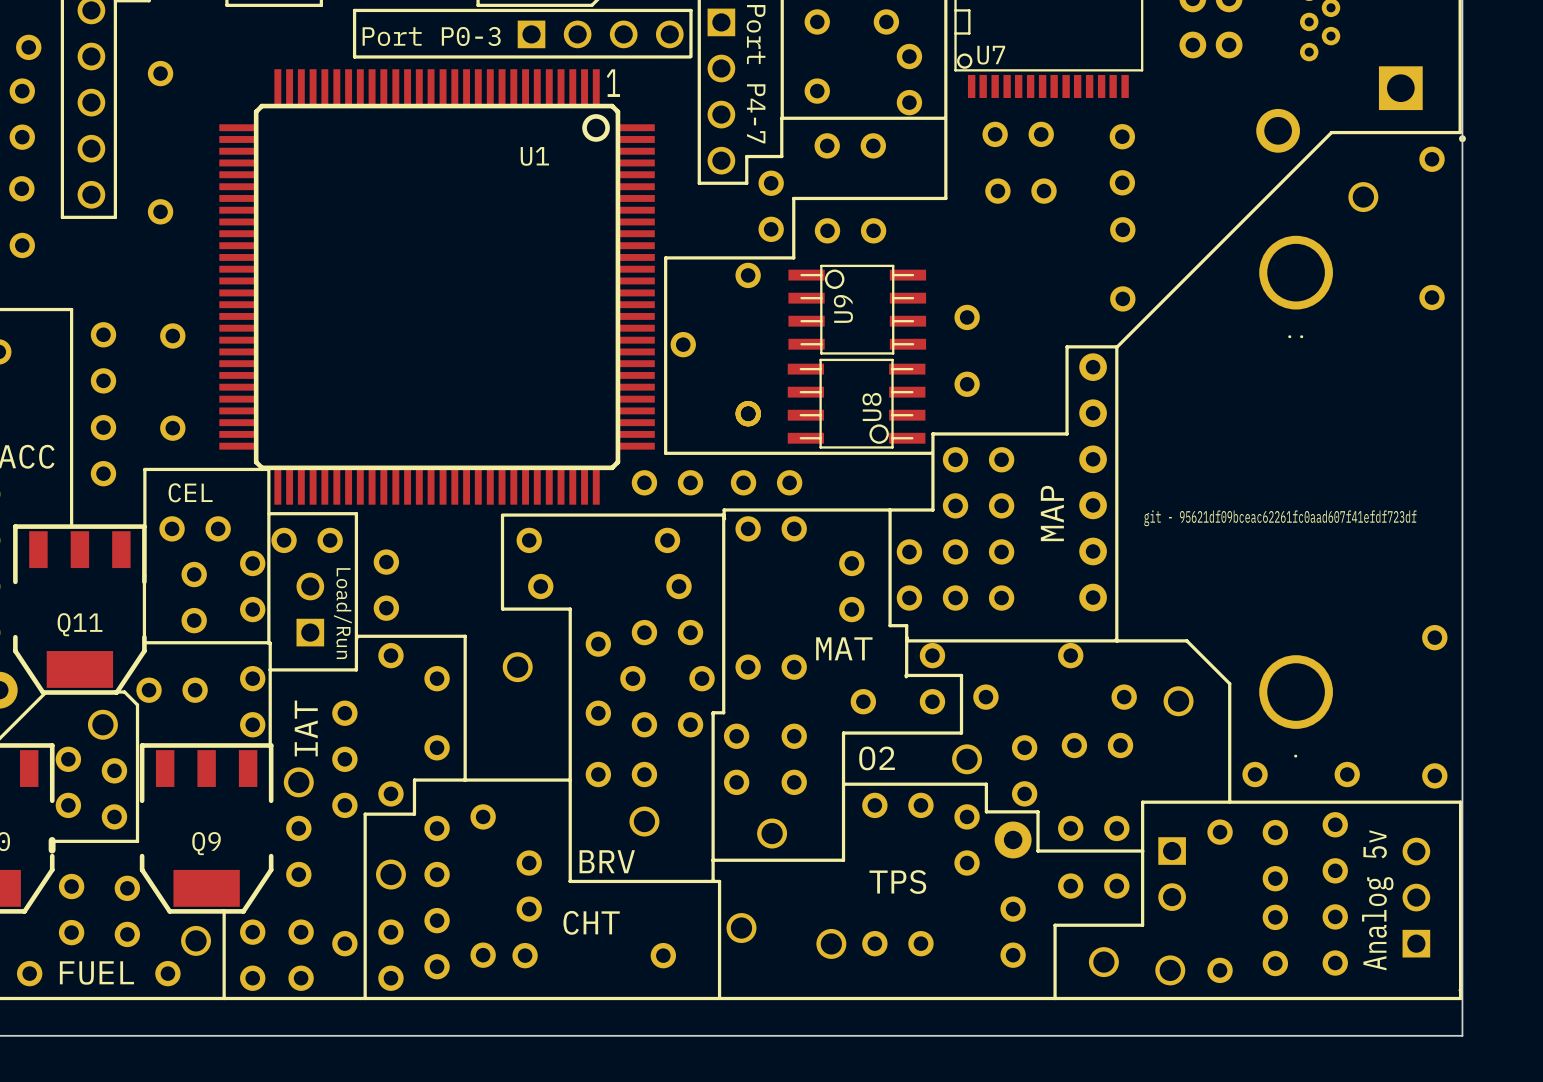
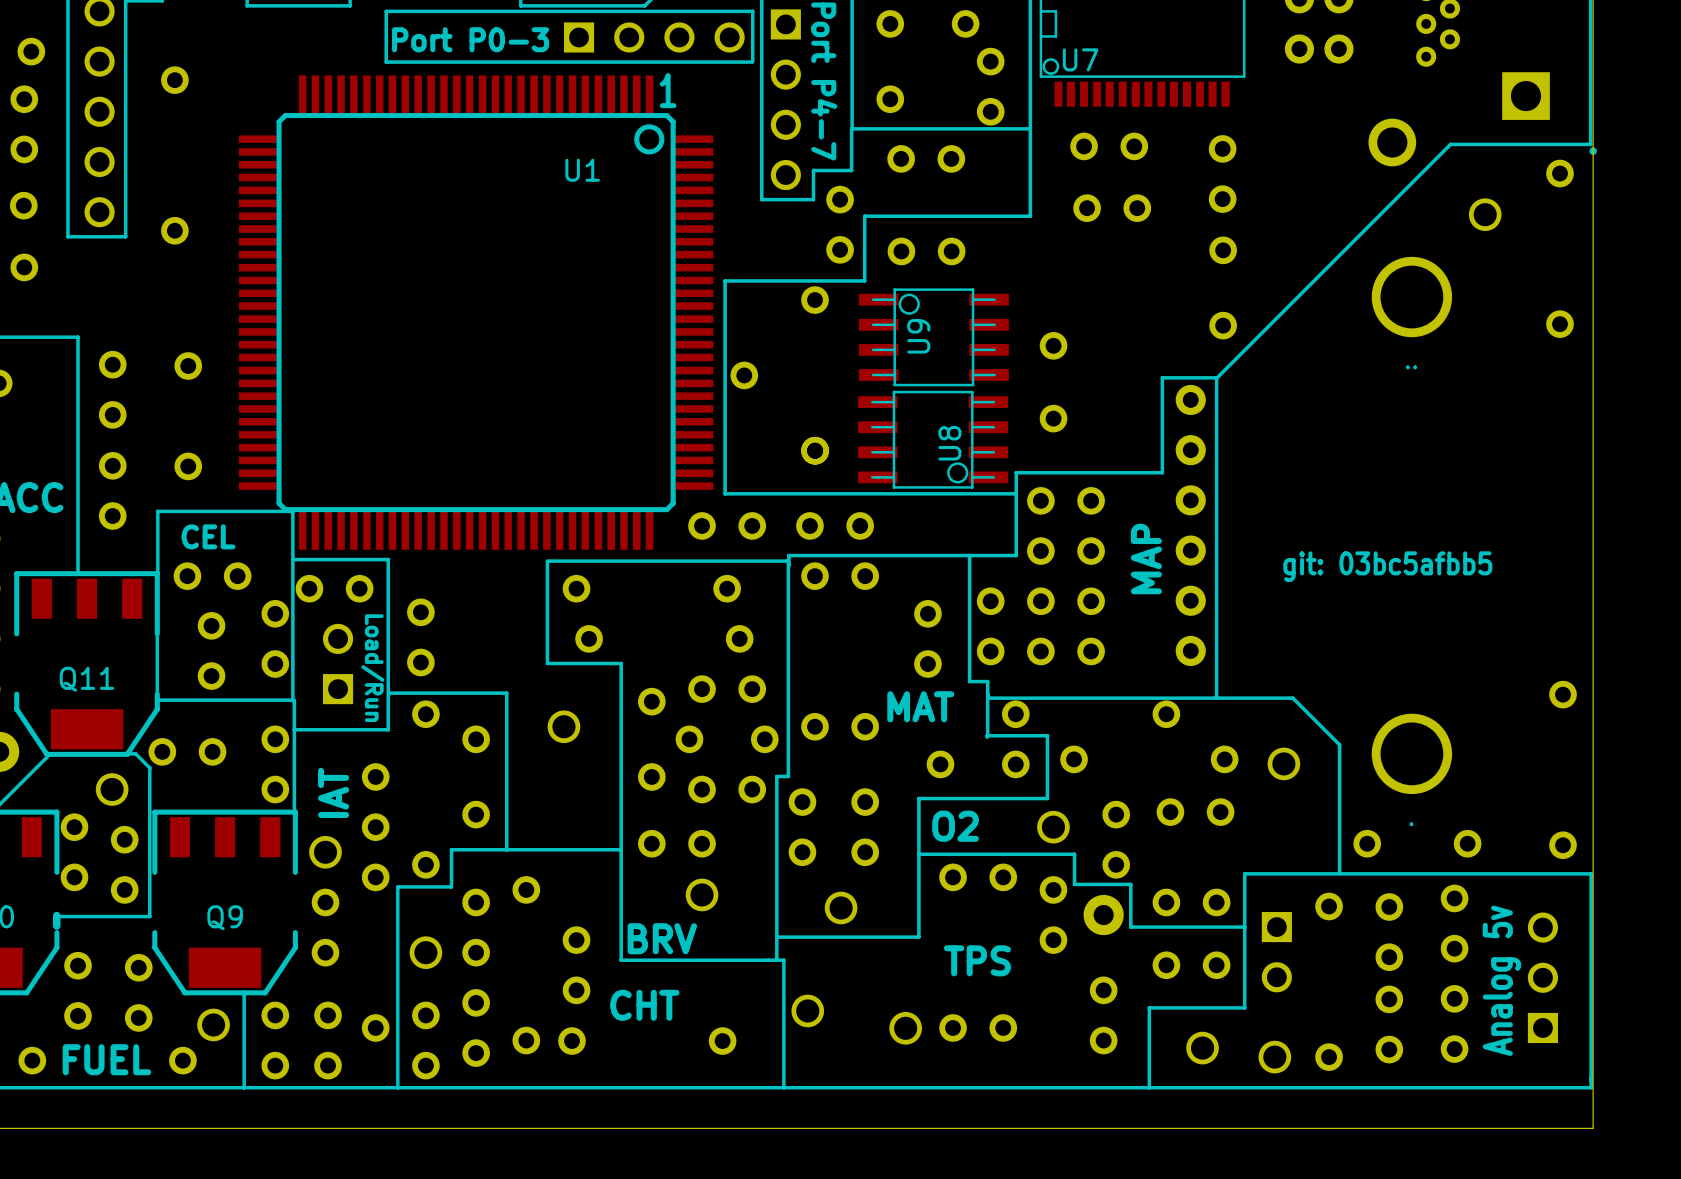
text: git - 95621df09bceac62261fc0aad607f41efdf723df (1280, 518) -> git: 03bc5afbb5 (1387, 566)

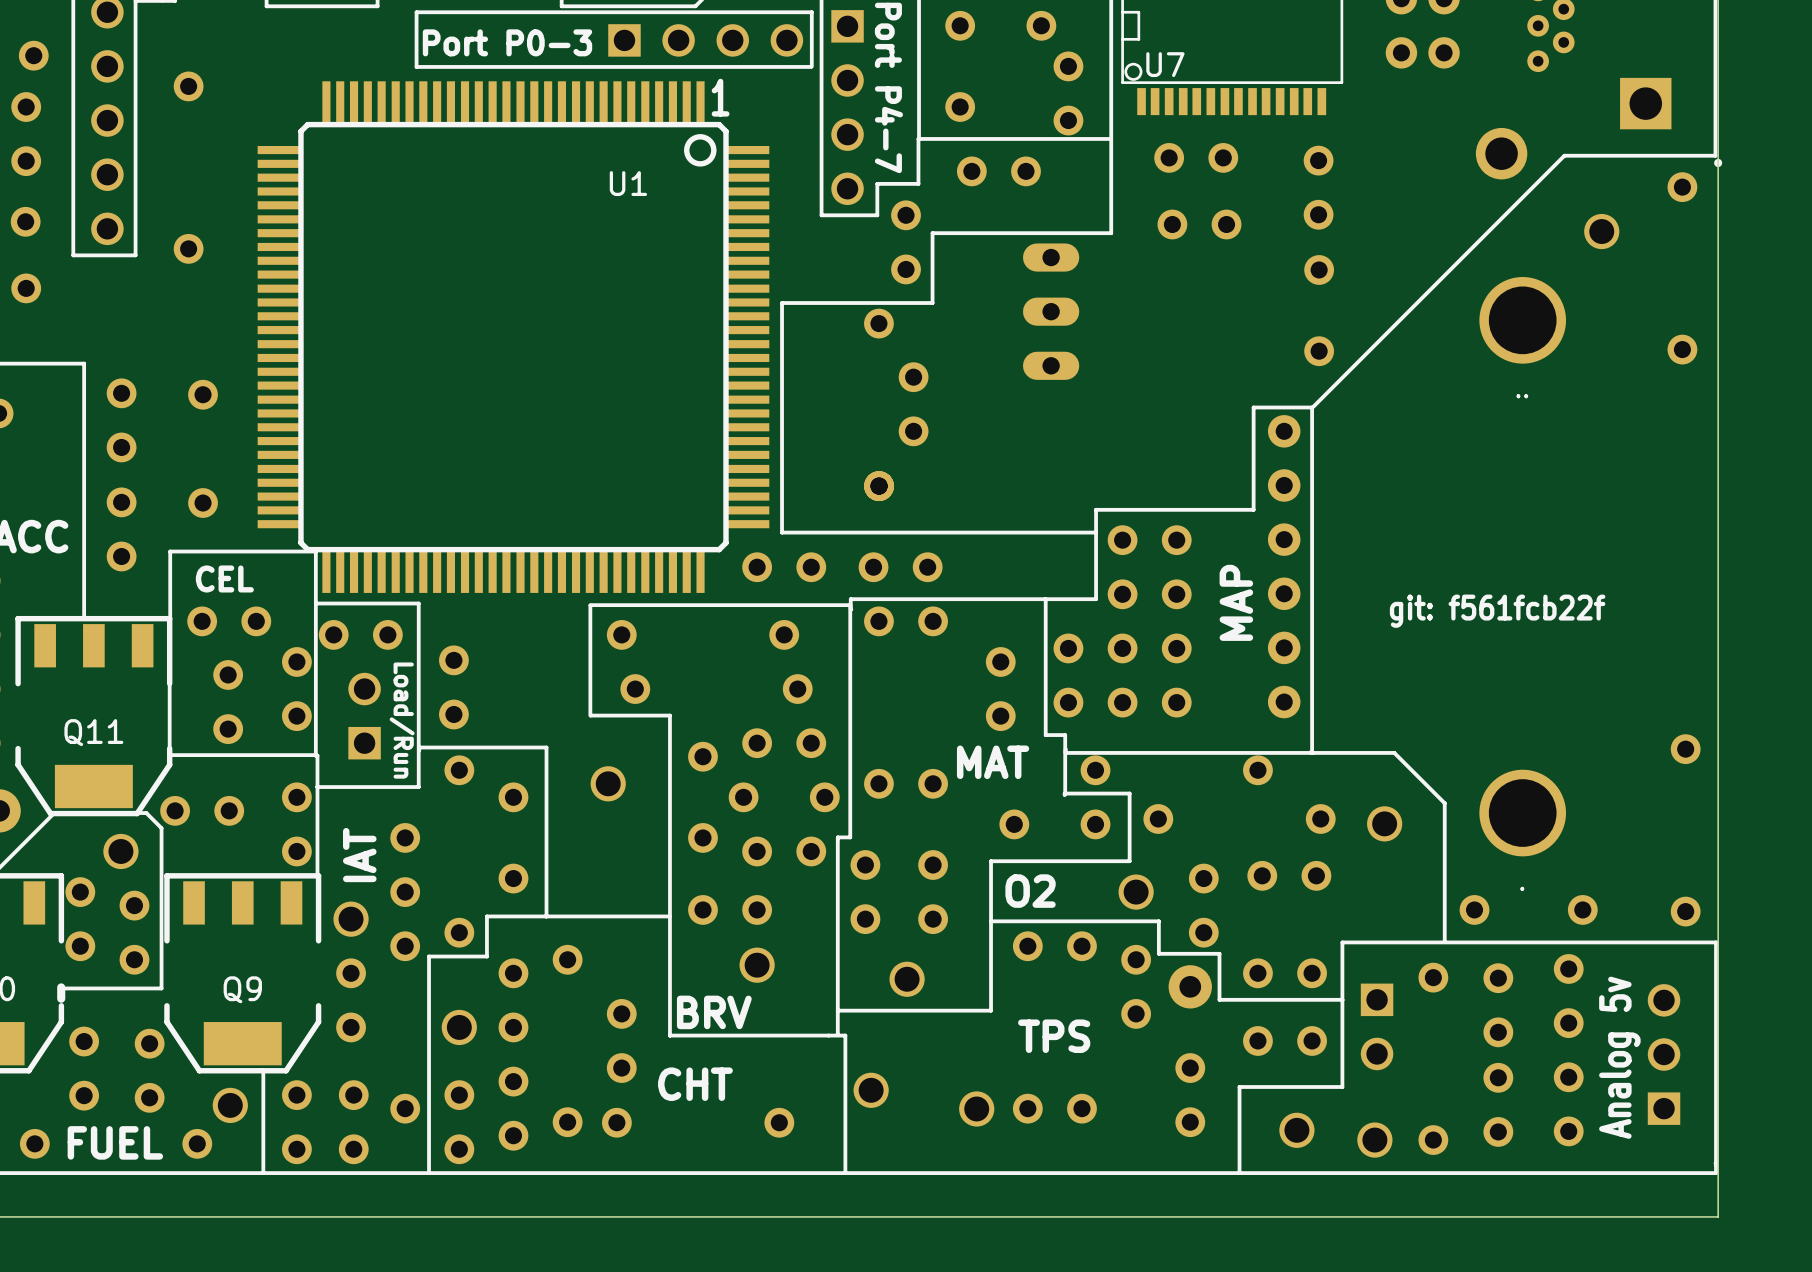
part: (926, 251) -> none
part: none -> (1051, 311)
U9: (933, 337) -> none
part: (1053, 345) -> none
part: none -> (913, 377)
part: (744, 375) -> none
part: none -> (913, 431)
part: (1053, 418) -> none
U8: (933, 439) -> none
text: git: 03bc5afbb5 (1387, 566) -> git: f561fcb22f (1497, 611)

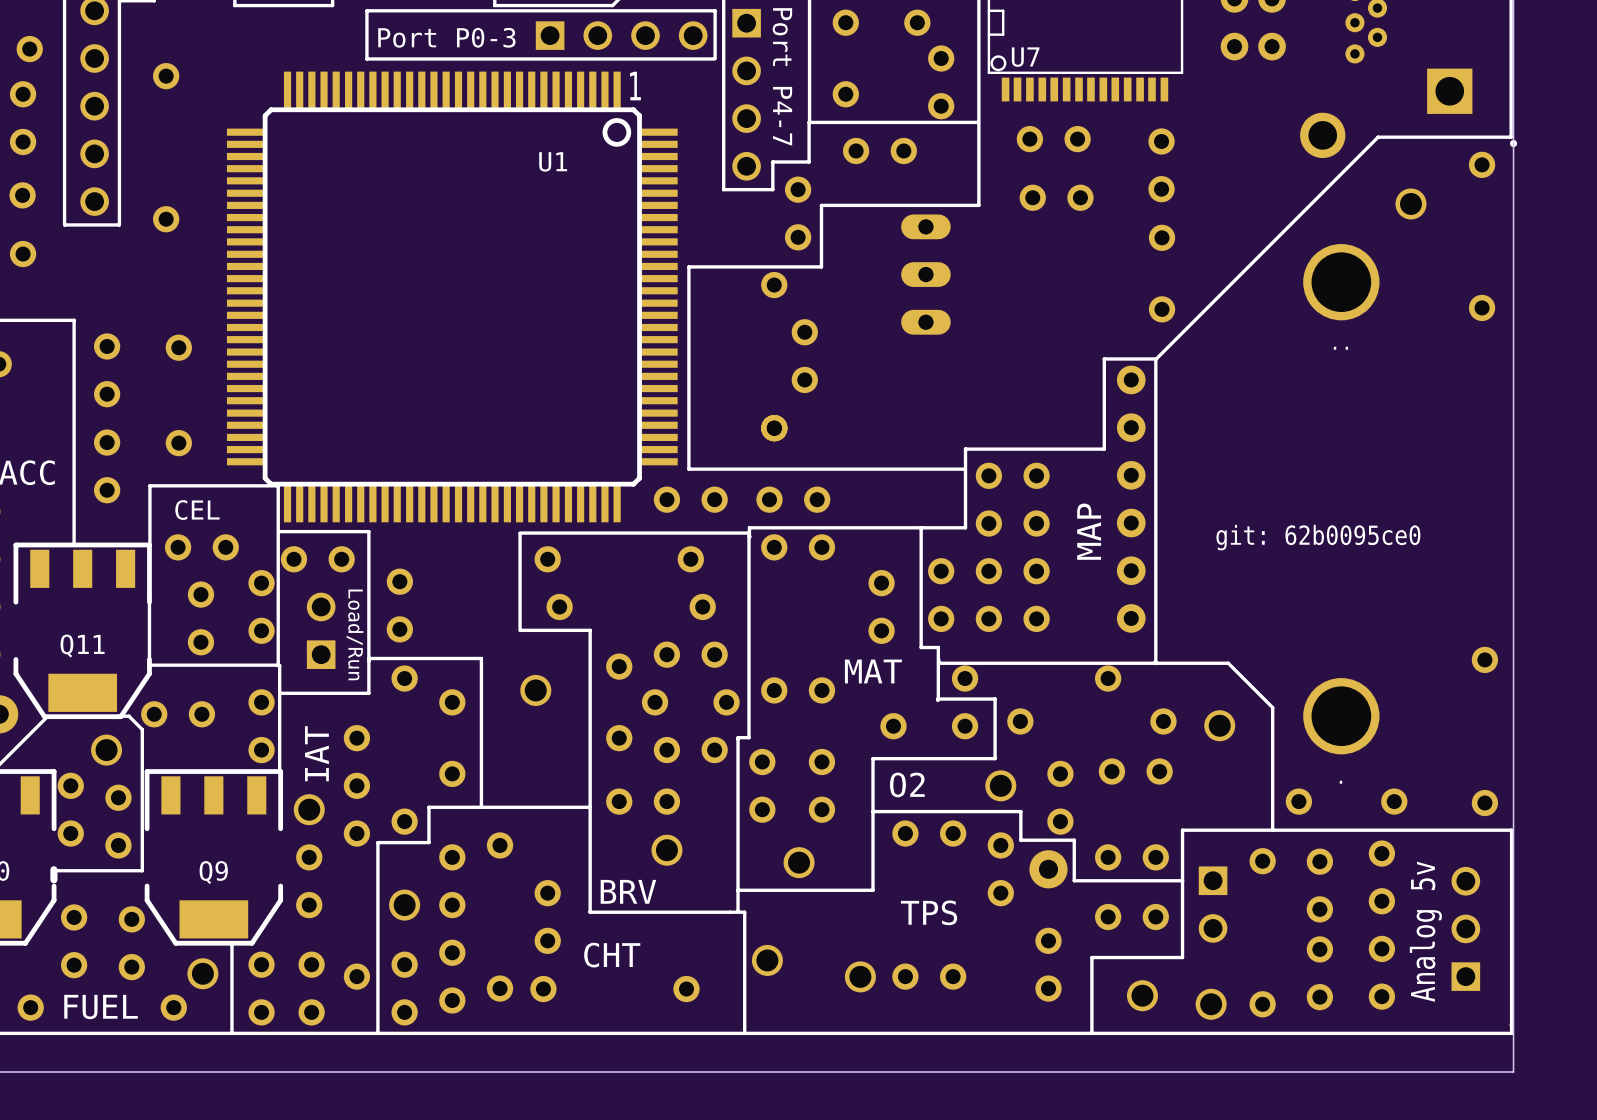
text: git: f561fcb22f (1497, 611) -> git: 62b0095ce0 (1318, 537)

